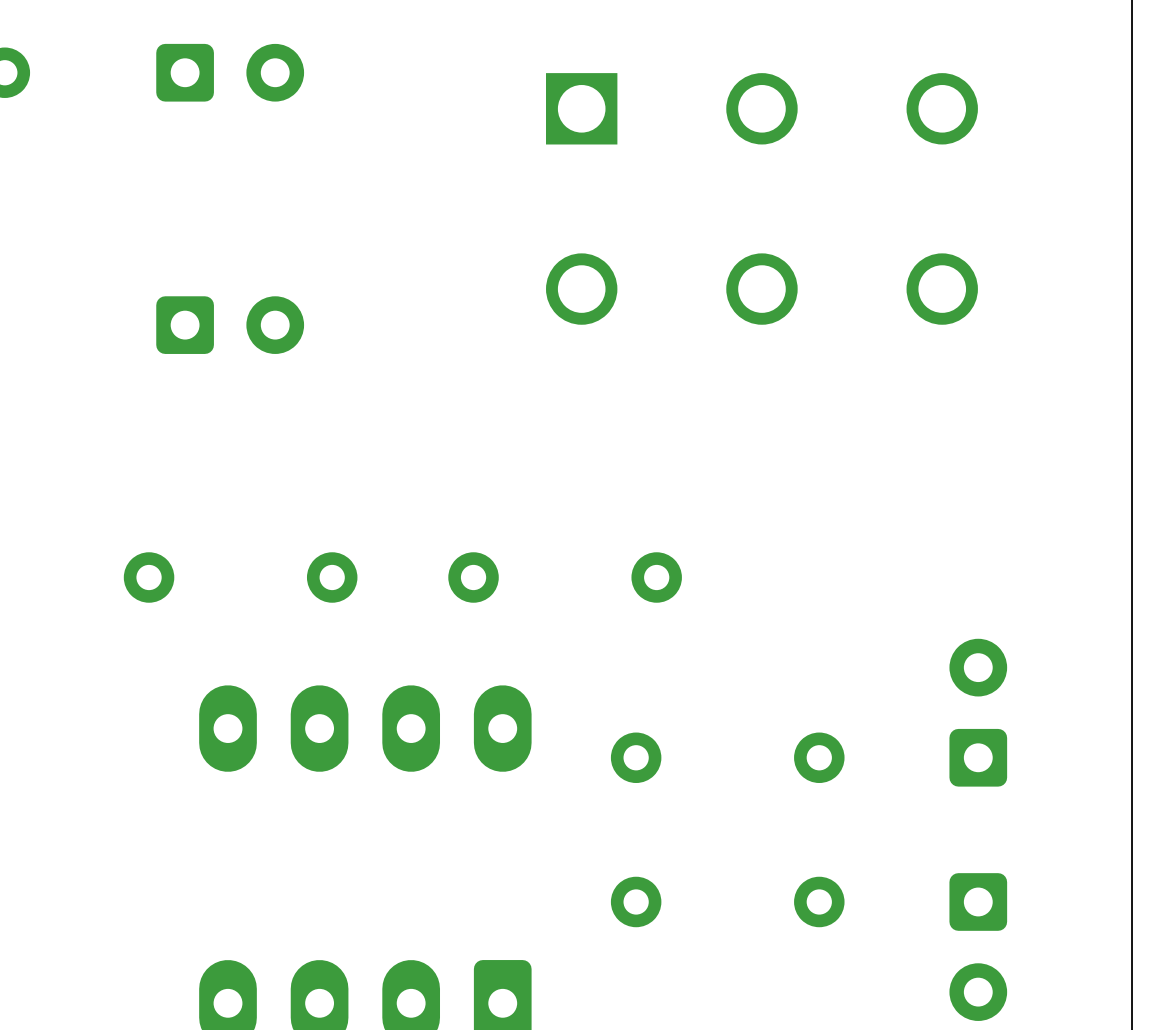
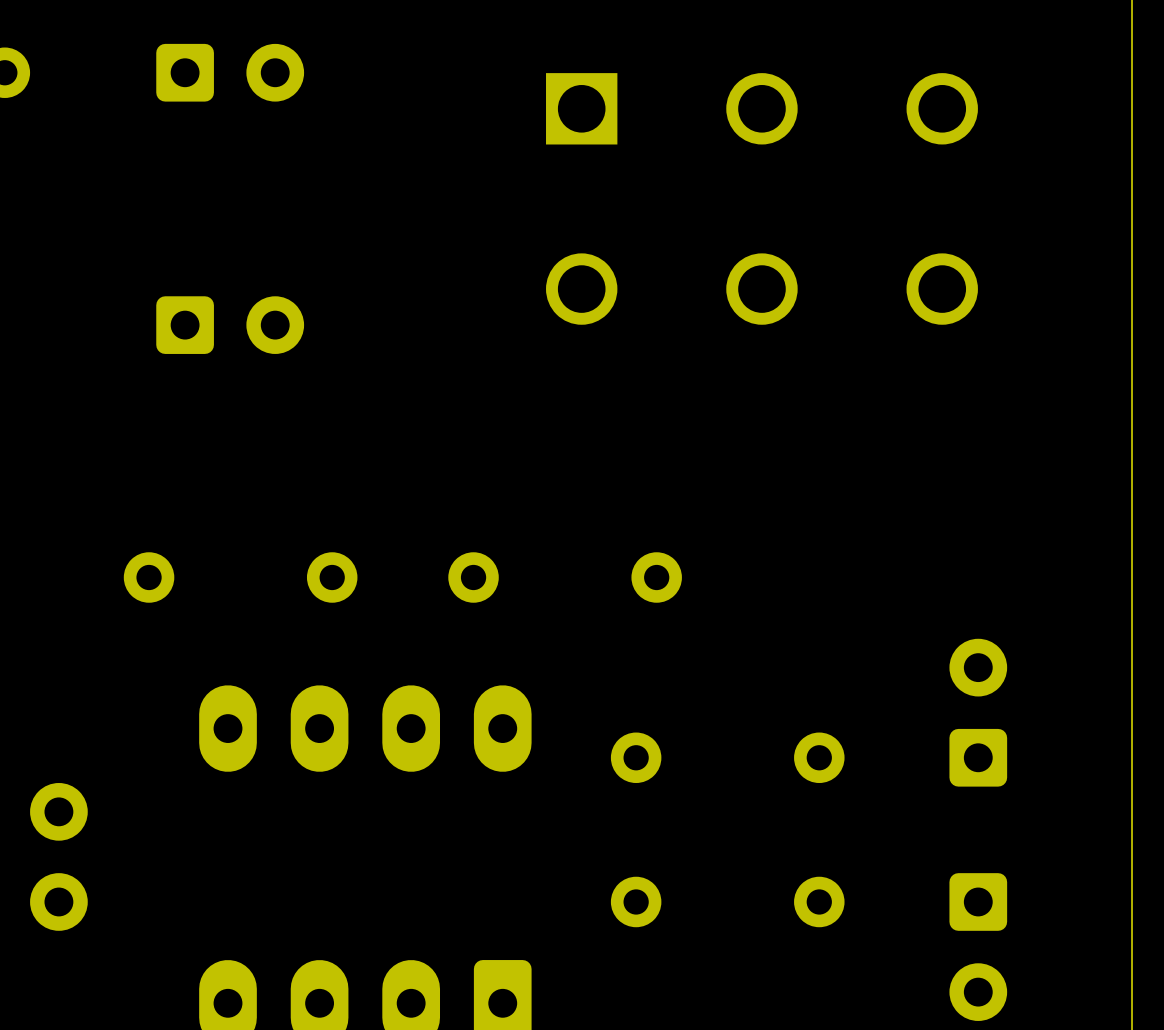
part: none -> (58, 856)

